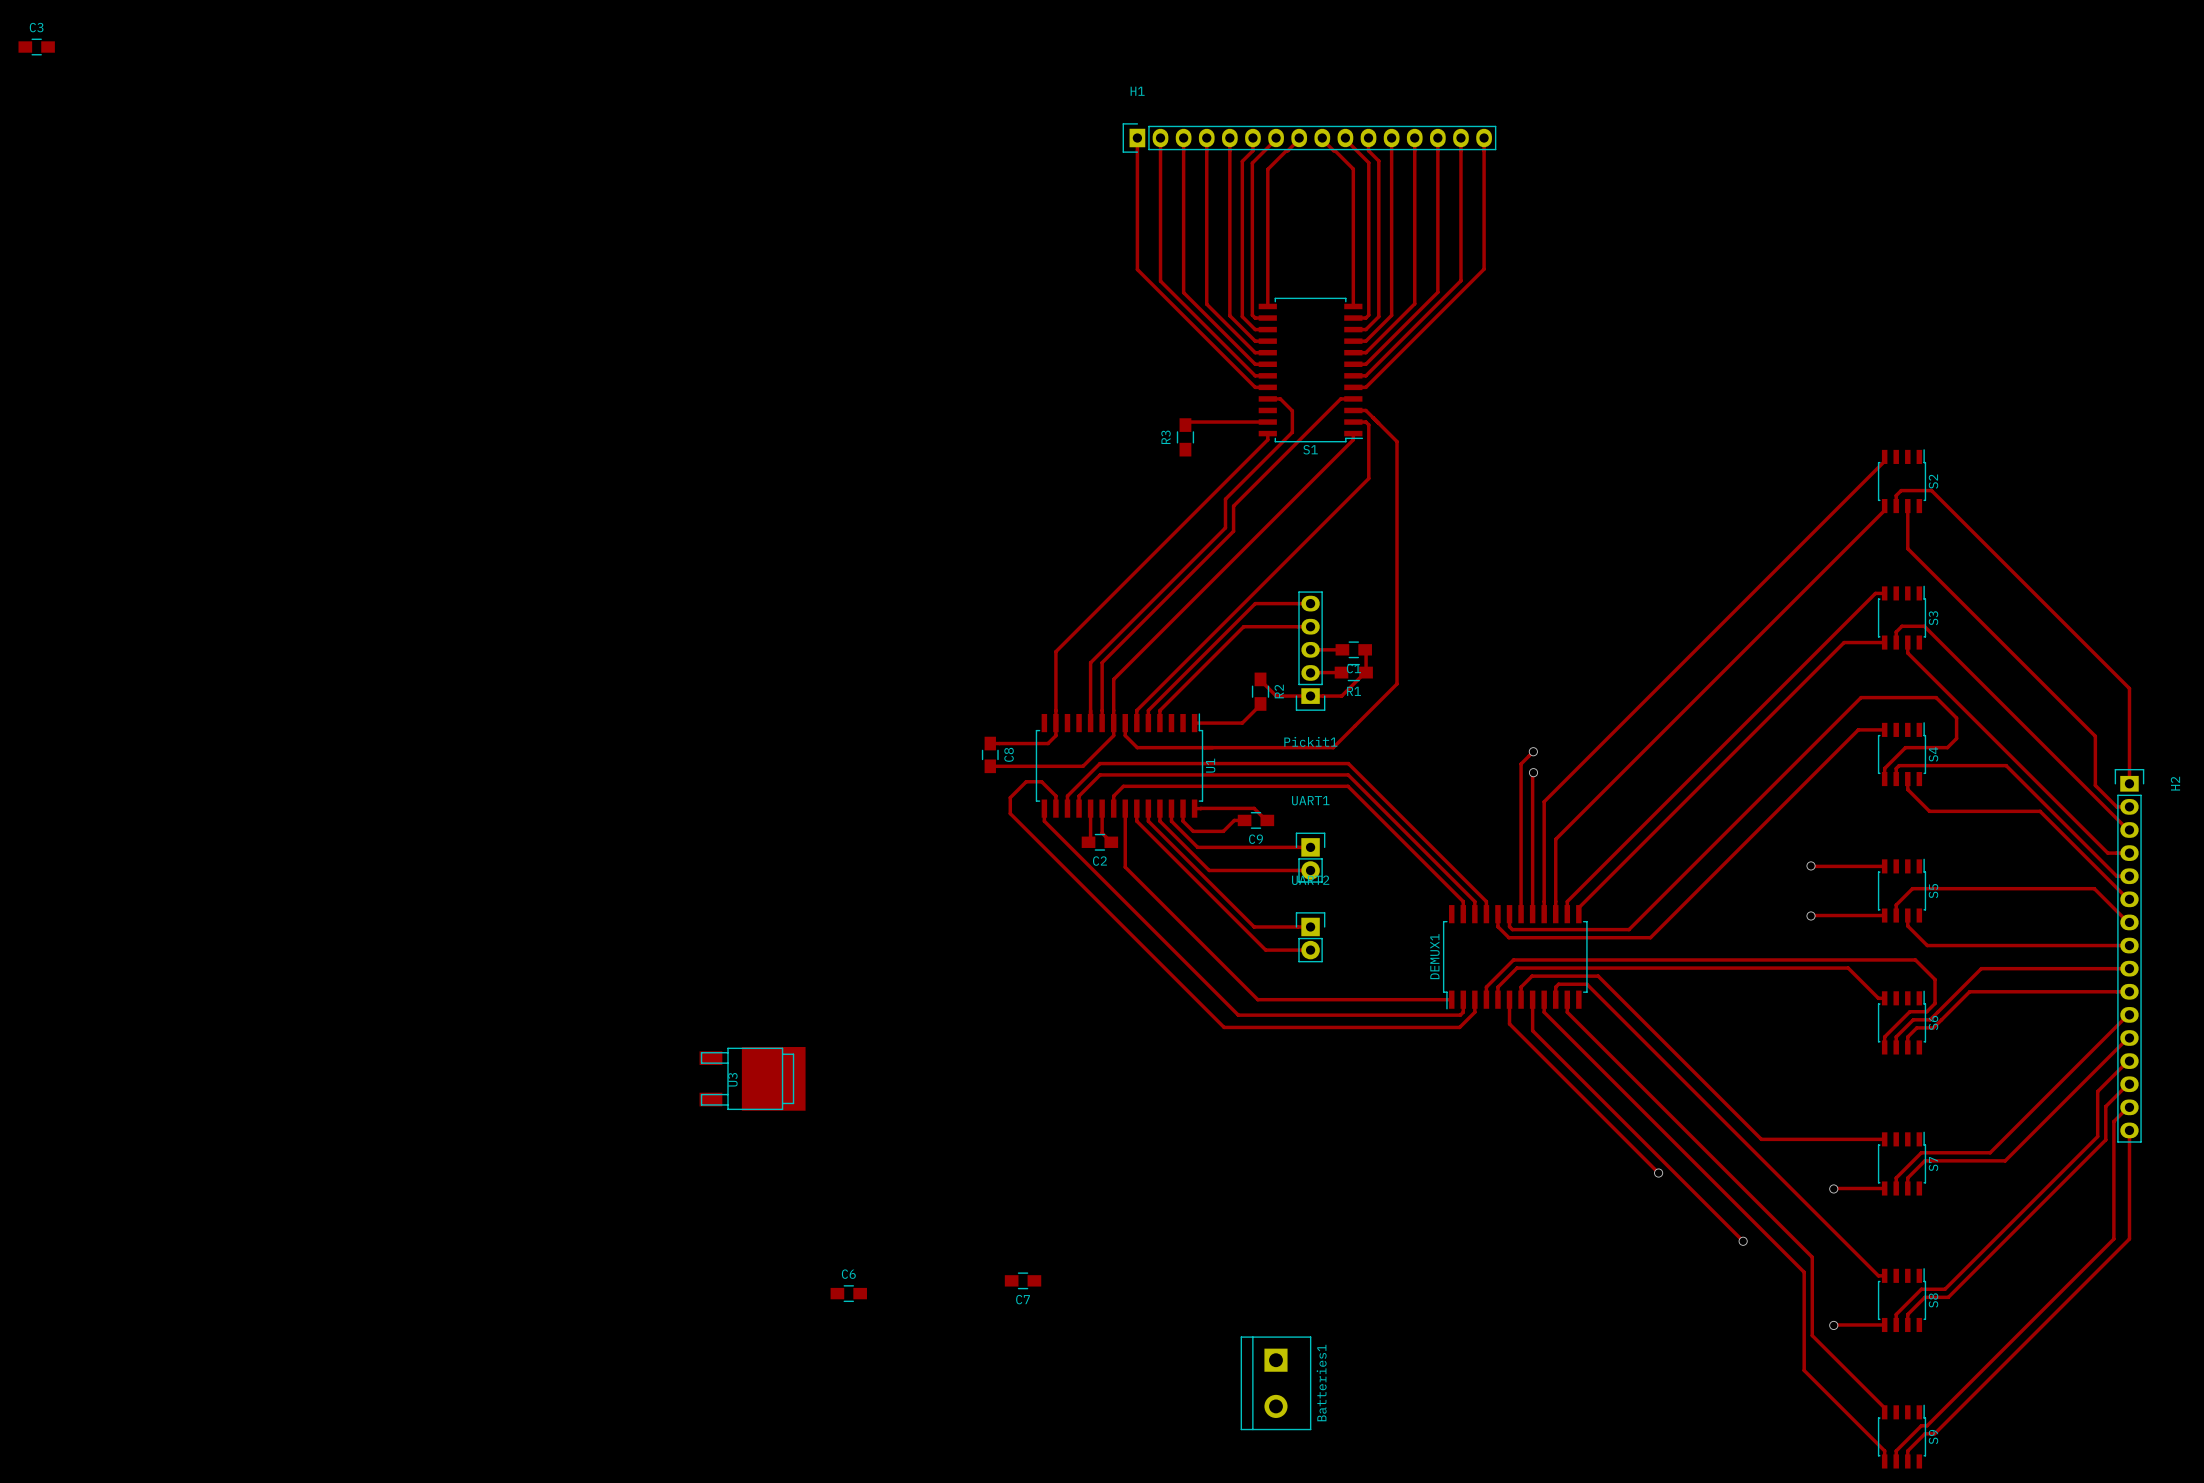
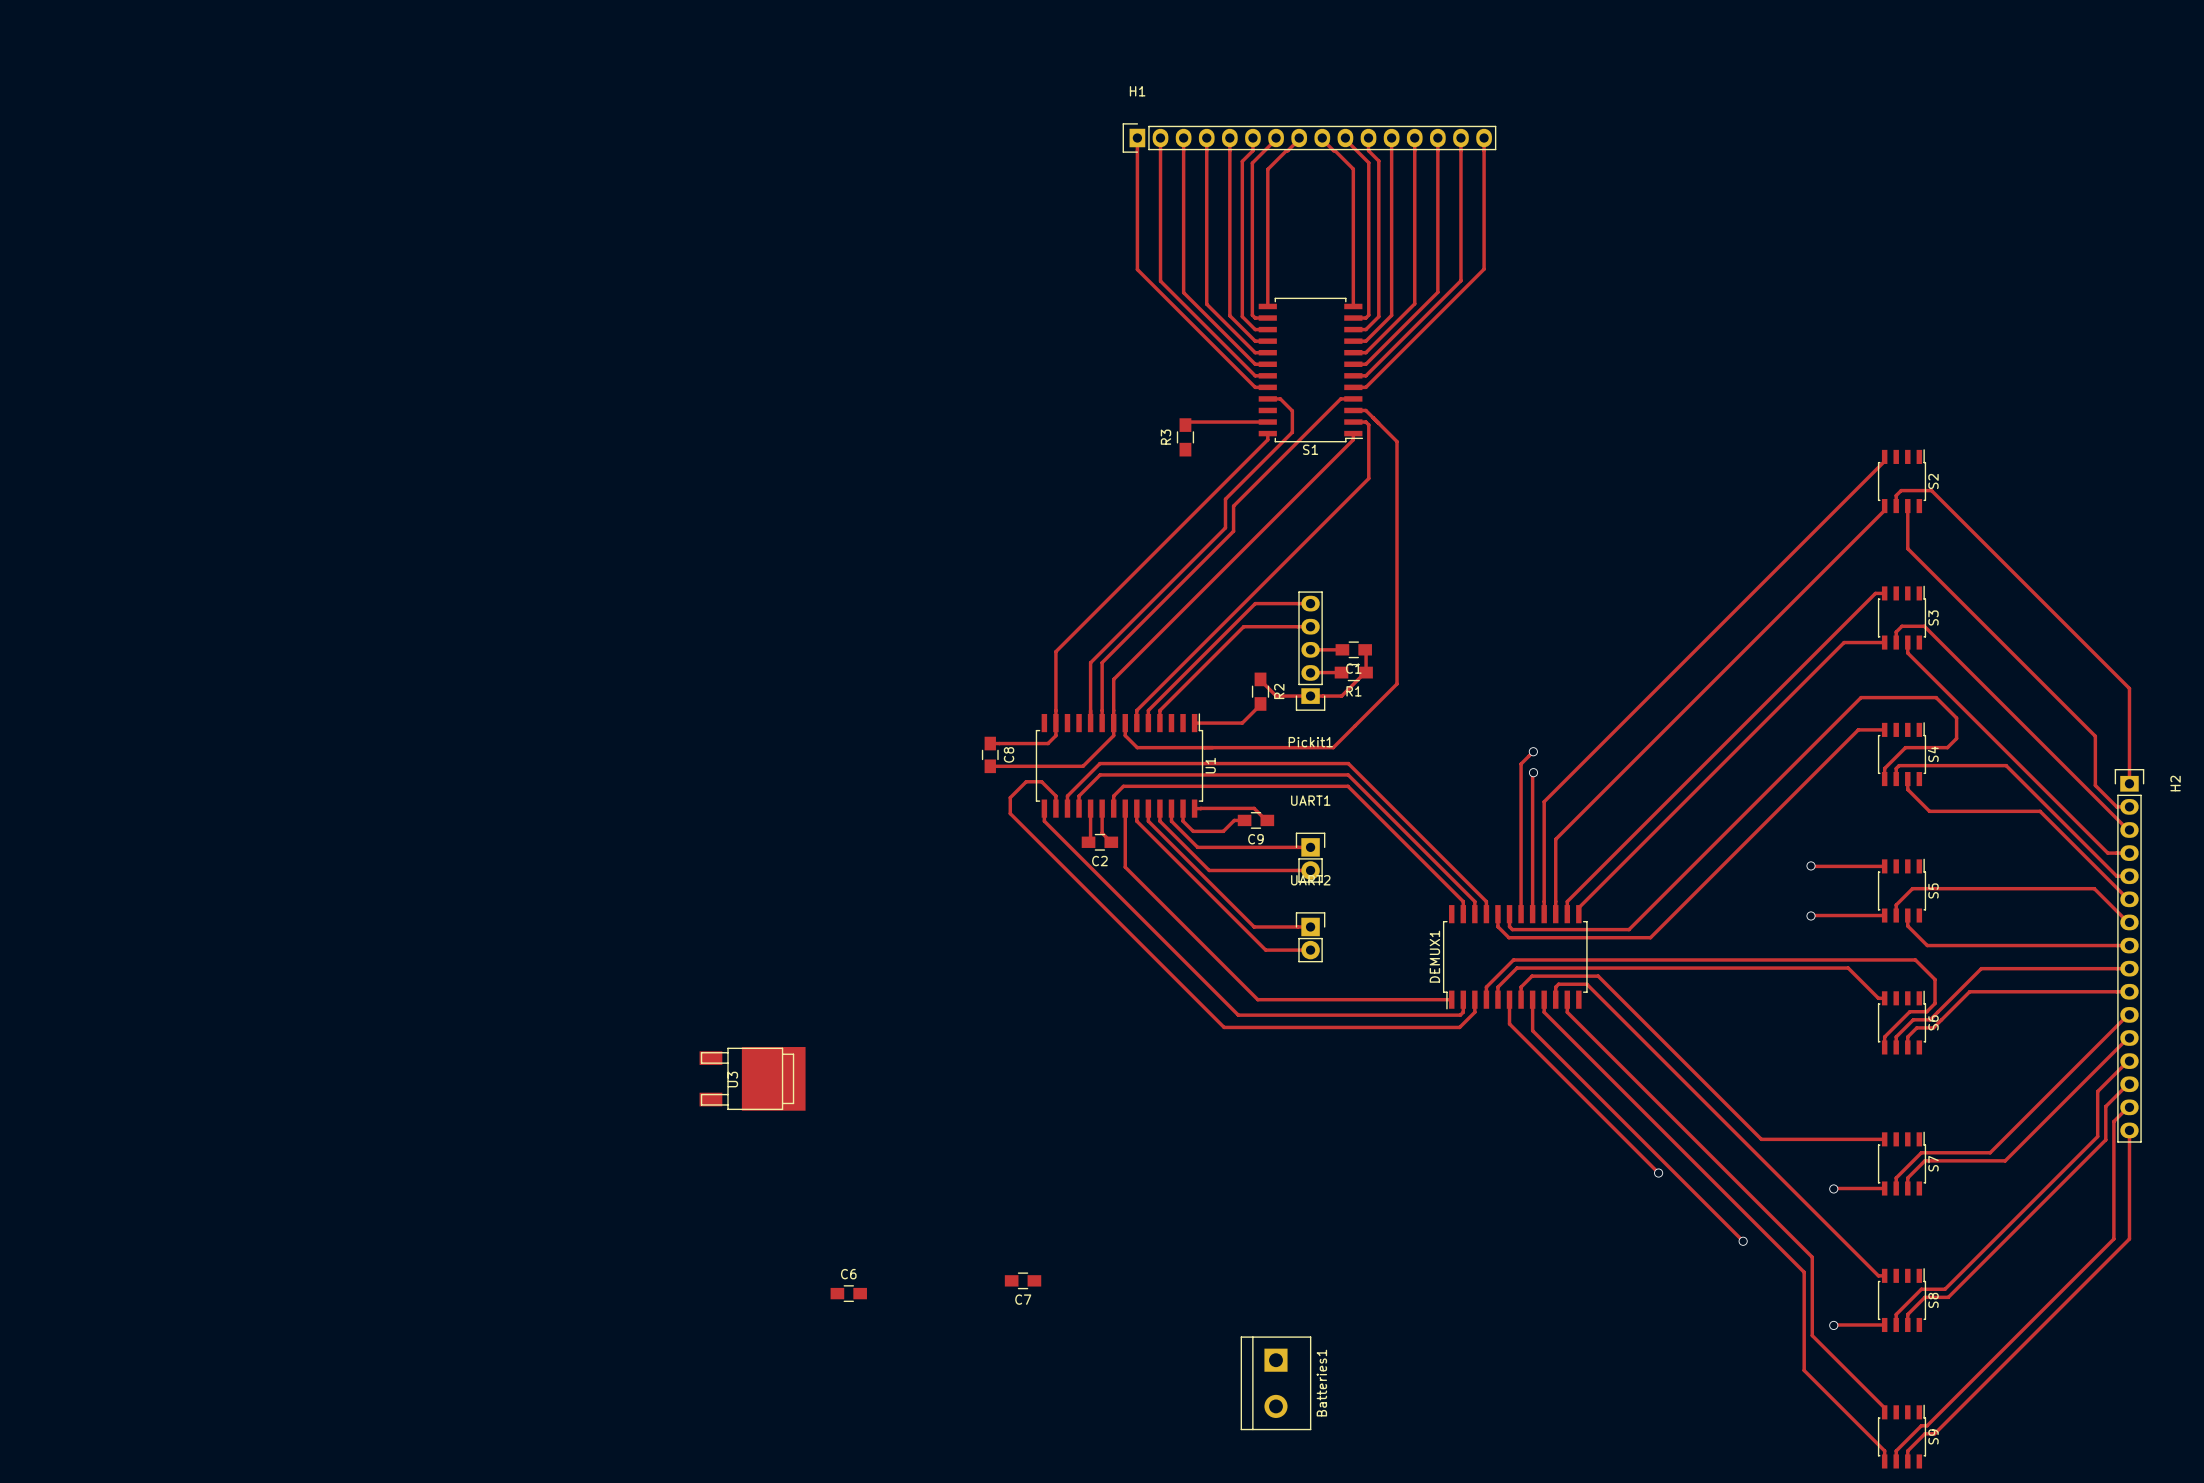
C3: (36, 47) -> none

